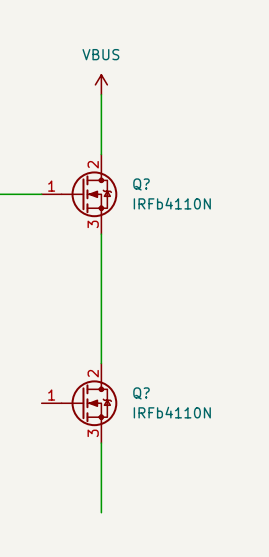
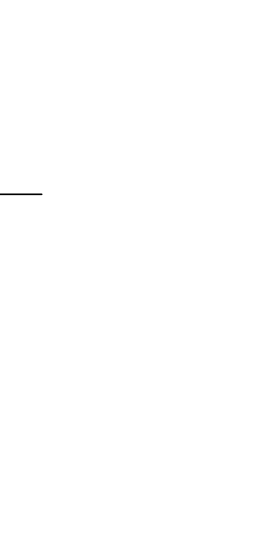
power symbol: VBUS (101, 84) -> none
wire: (101, 94) (101, 154) -> none
Q?: IRFb4110N (79, 194) -> none
wire: (101, 234) (101, 363) -> none
Q?: IRFb4110N (79, 403) -> none
wire: (101, 443) (101, 512) -> none

